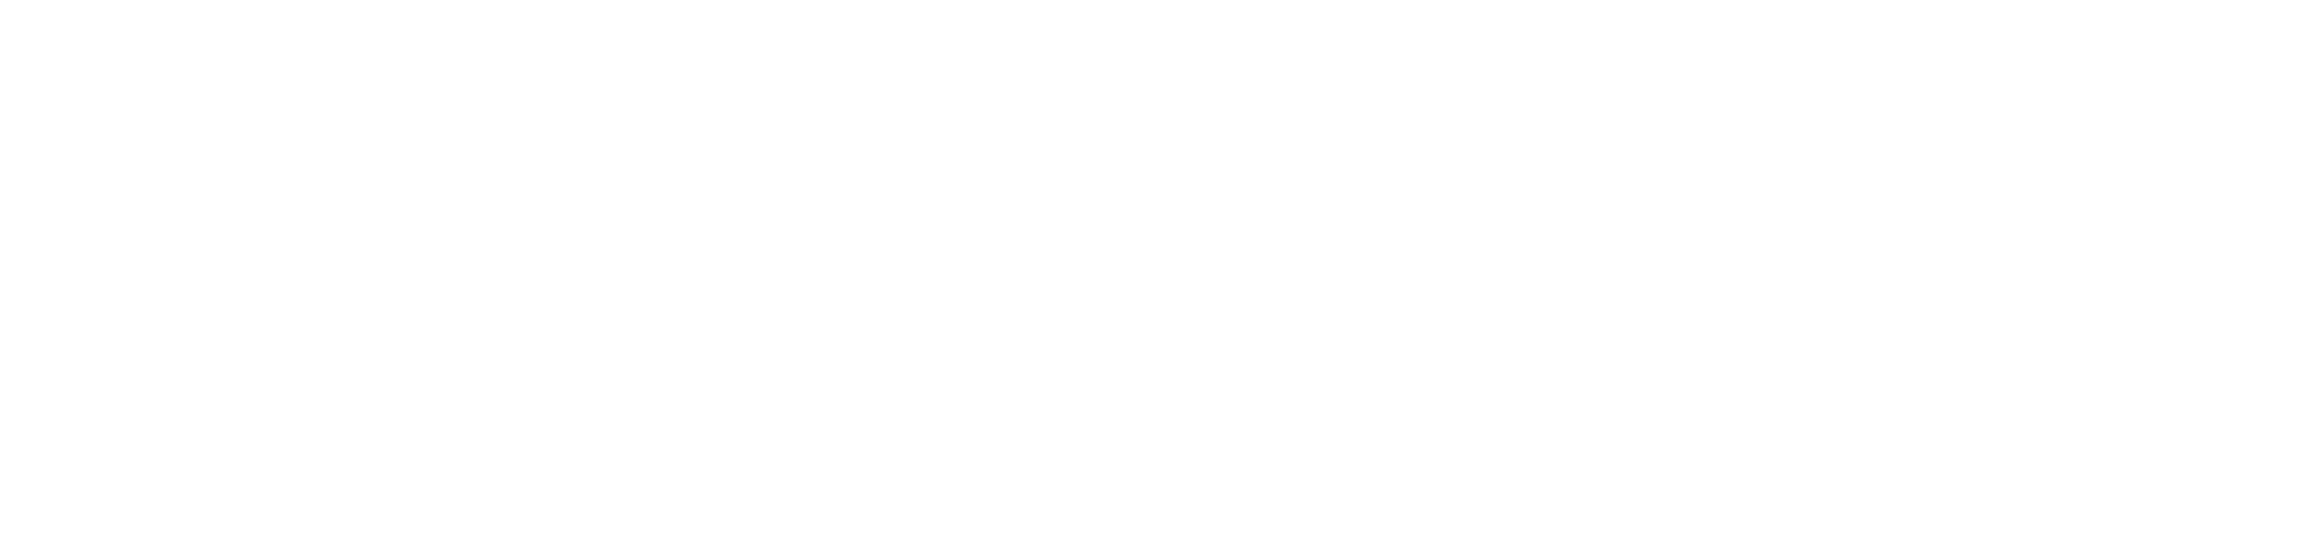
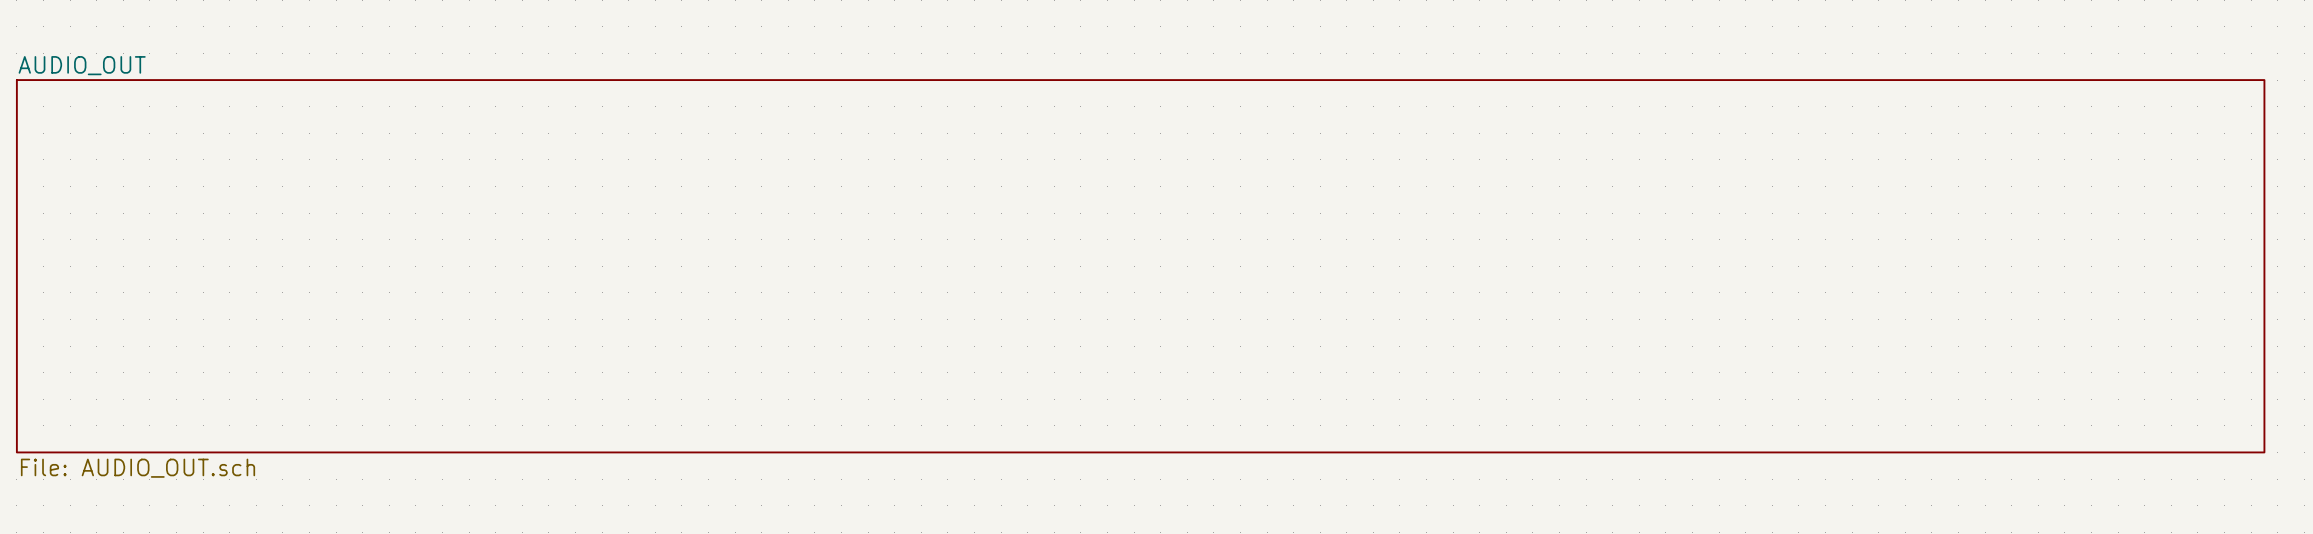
sheet AUDIO_OUT: none -> File: AUDIO_OUT.sch (1140, 266)

